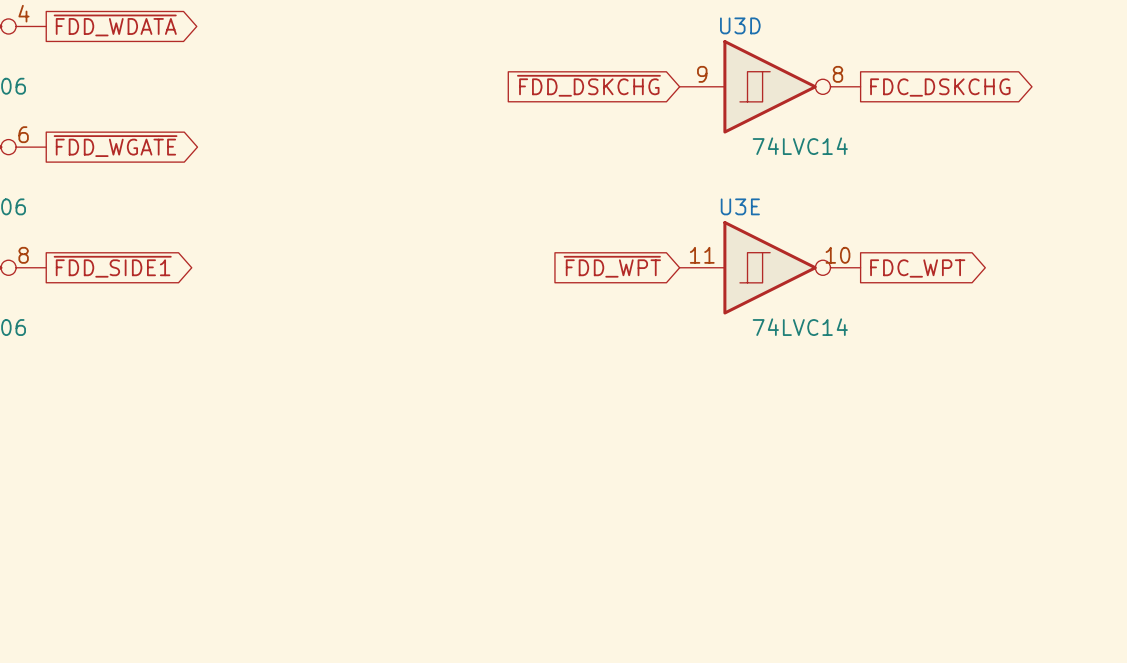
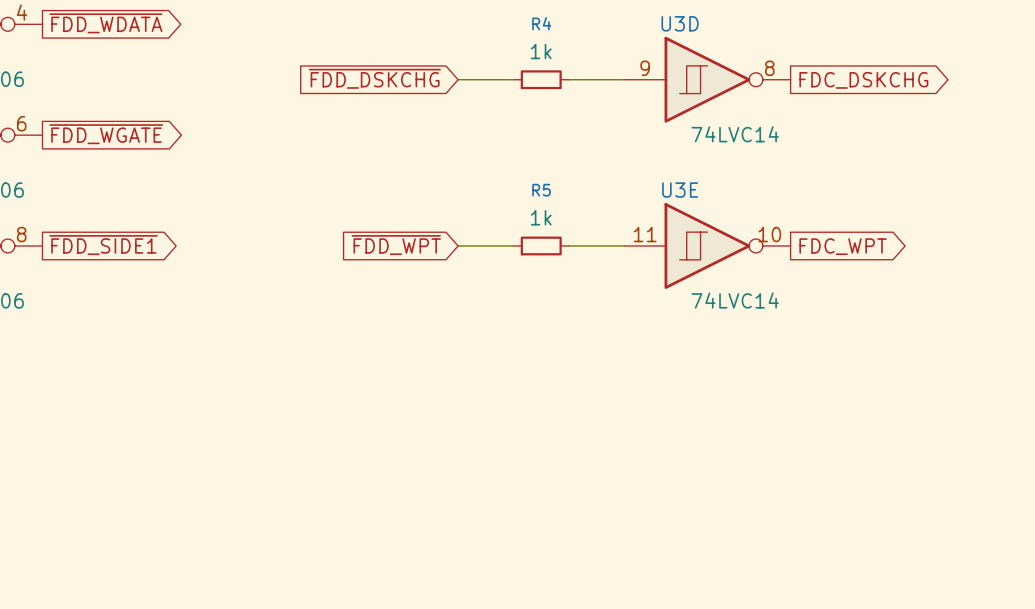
global label position: ~{FDD_DSKCHG} (588, 85) -> ~{FDD_DSKCHG} (374, 78)
wire: none -> (458, 79) (513, 79)
R4: none -> 1k (541, 79)
wire: none -> (568, 79) (624, 79)
global label position: ~{FDD_WPT} (612, 266) -> ~{FDD_WPT} (396, 245)
wire: none -> (458, 245) (513, 245)
R5: none -> 1k (541, 245)
wire: none -> (568, 245) (624, 245)

